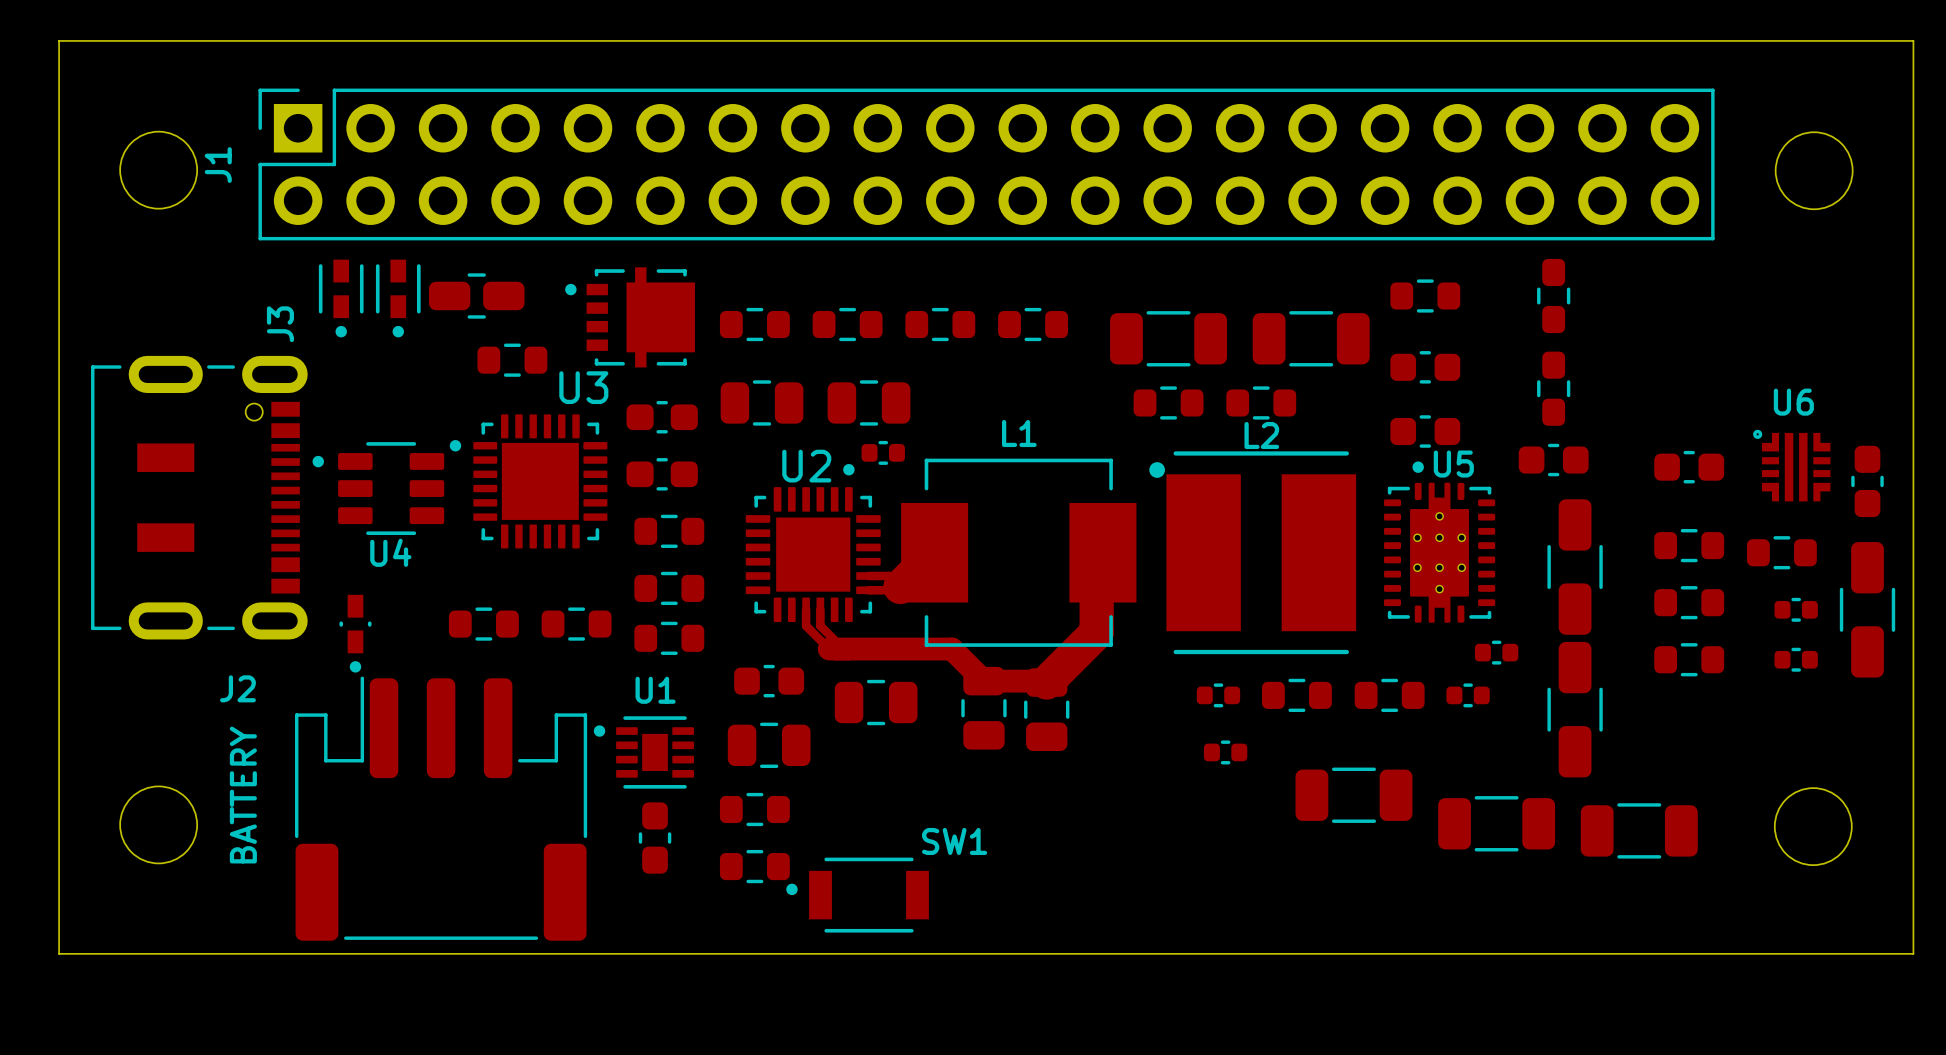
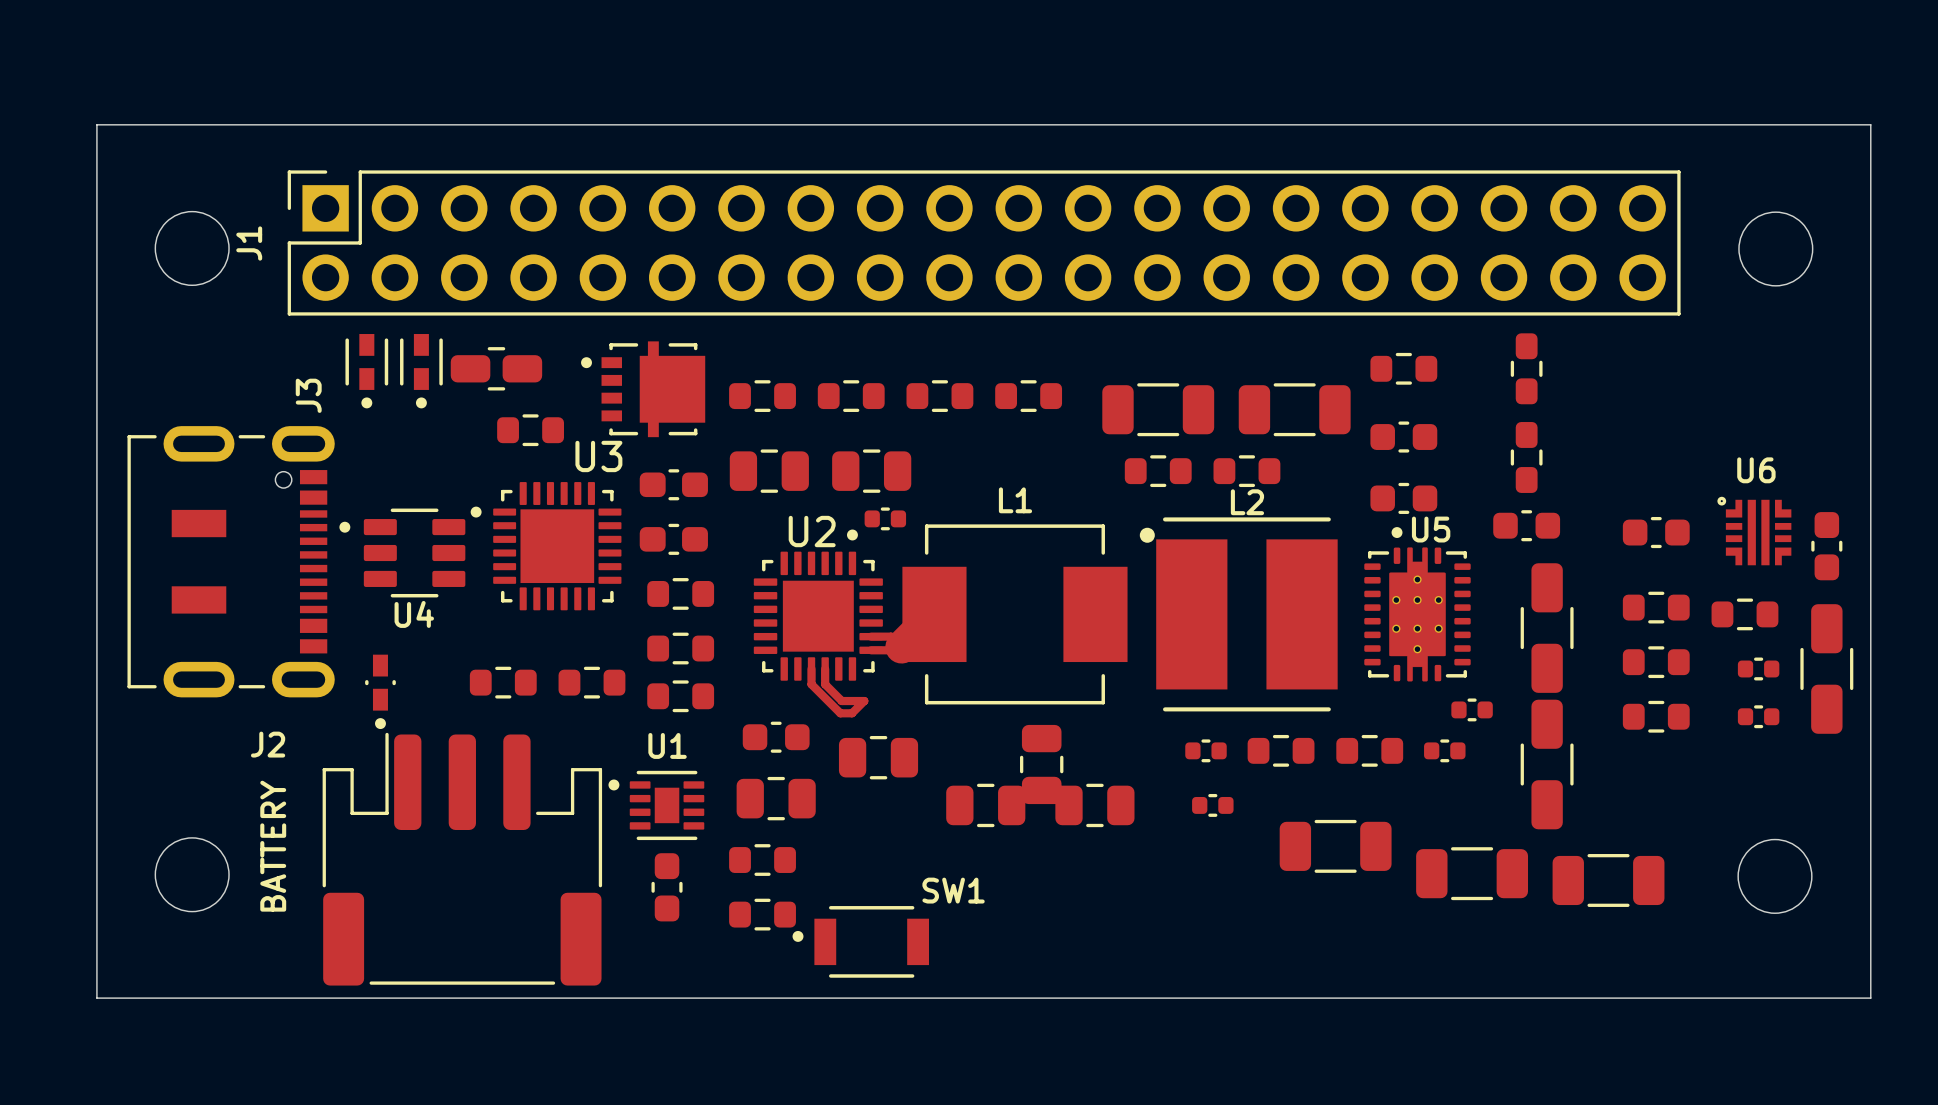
top track: (1102, 552) (1096, 559) (1096, 632) (1046, 682) (983, 681) (951, 649) (829, 649) -> none
part rotation: 0° (983, 708) -> 90° clockwise (985, 805)
part: none -> (1094, 805)

